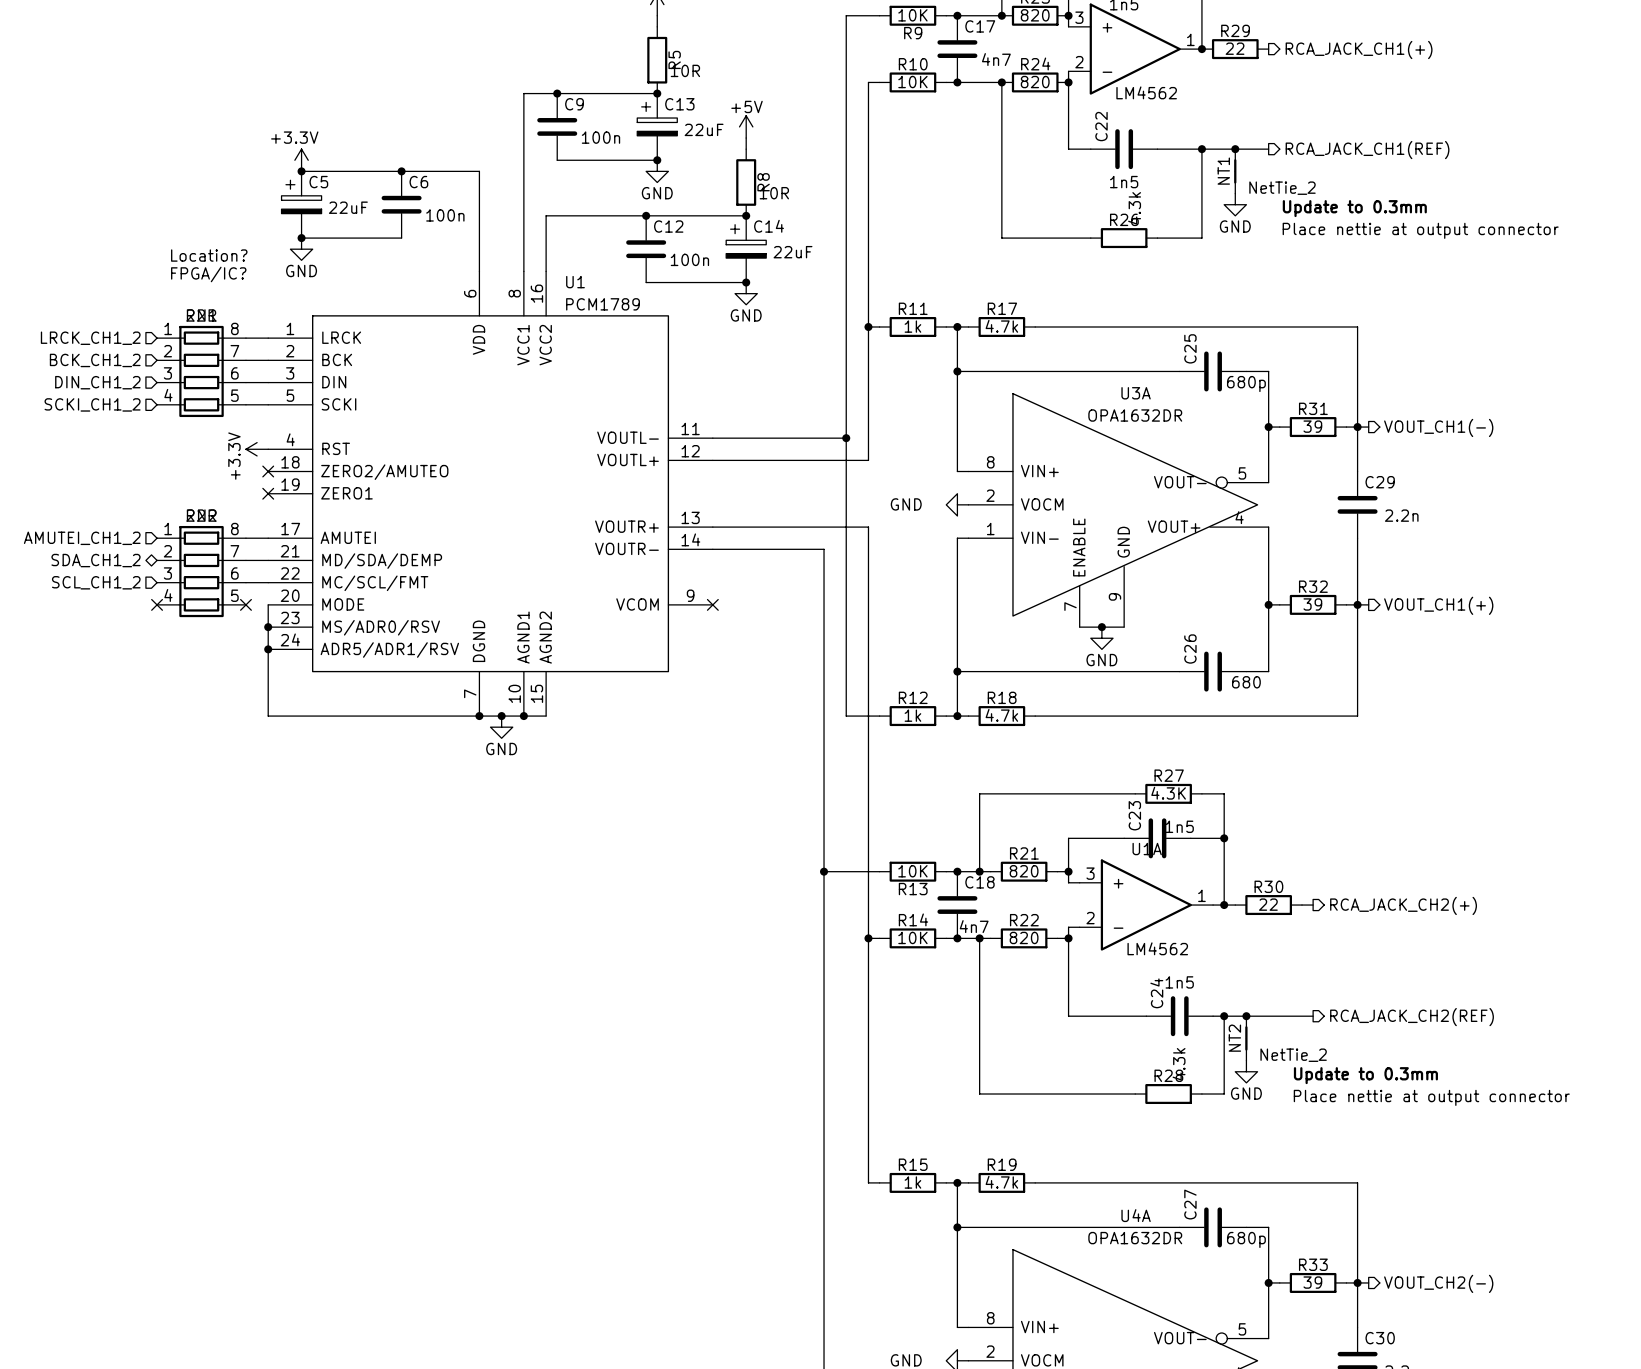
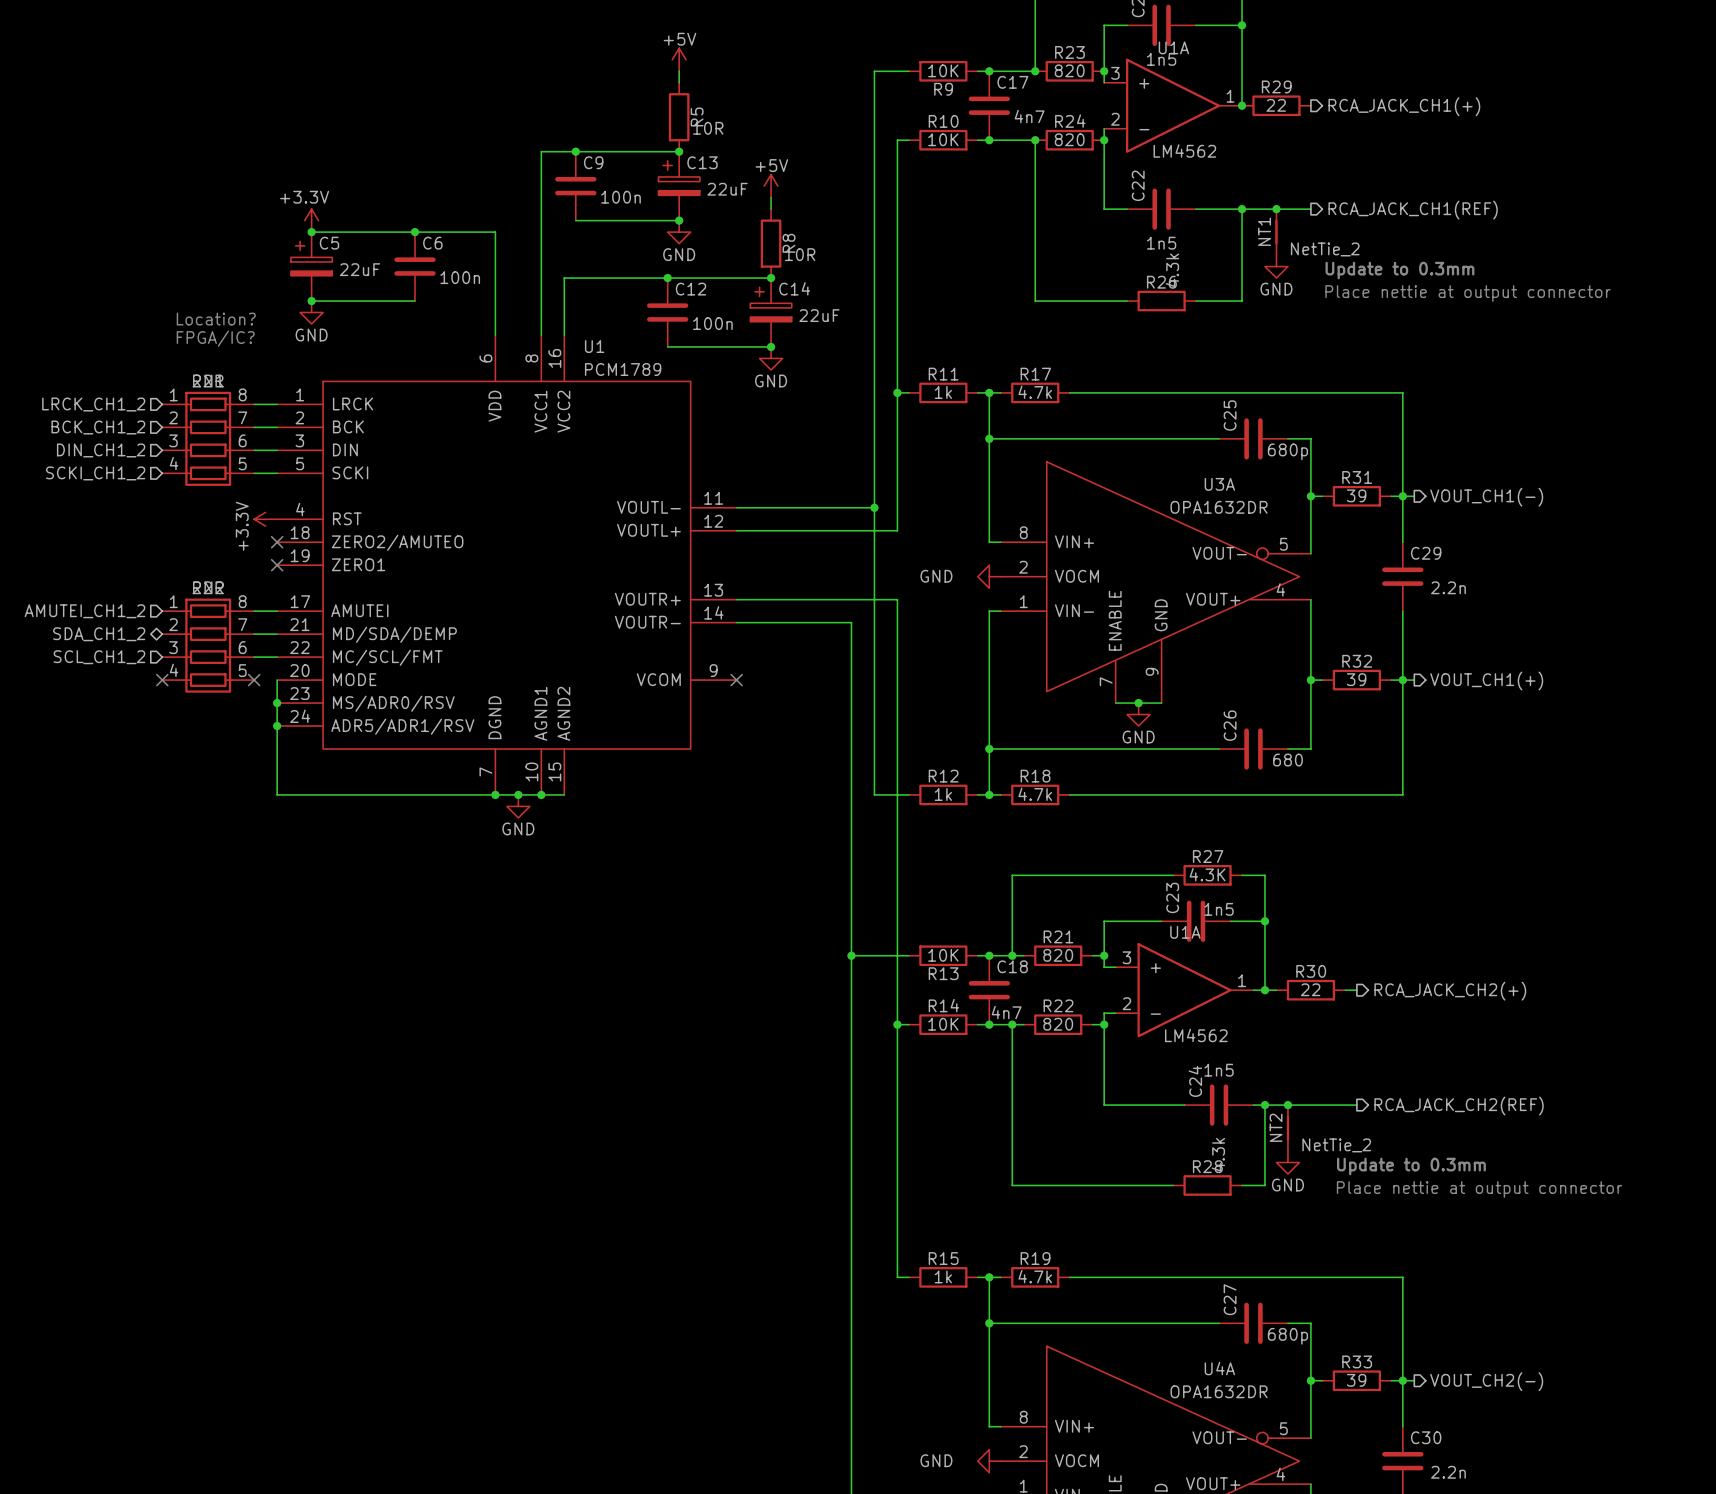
U3A name position: U3A (1136, 393) -> U3A (1219, 484)
U3A value position: OPA1632DR (1135, 415) -> OPA1632DR (1219, 507)
U4A name position: U4A (1136, 1215) -> U4A (1219, 1368)
U4A value position: OPA1632DR (1135, 1238) -> OPA1632DR (1219, 1391)

